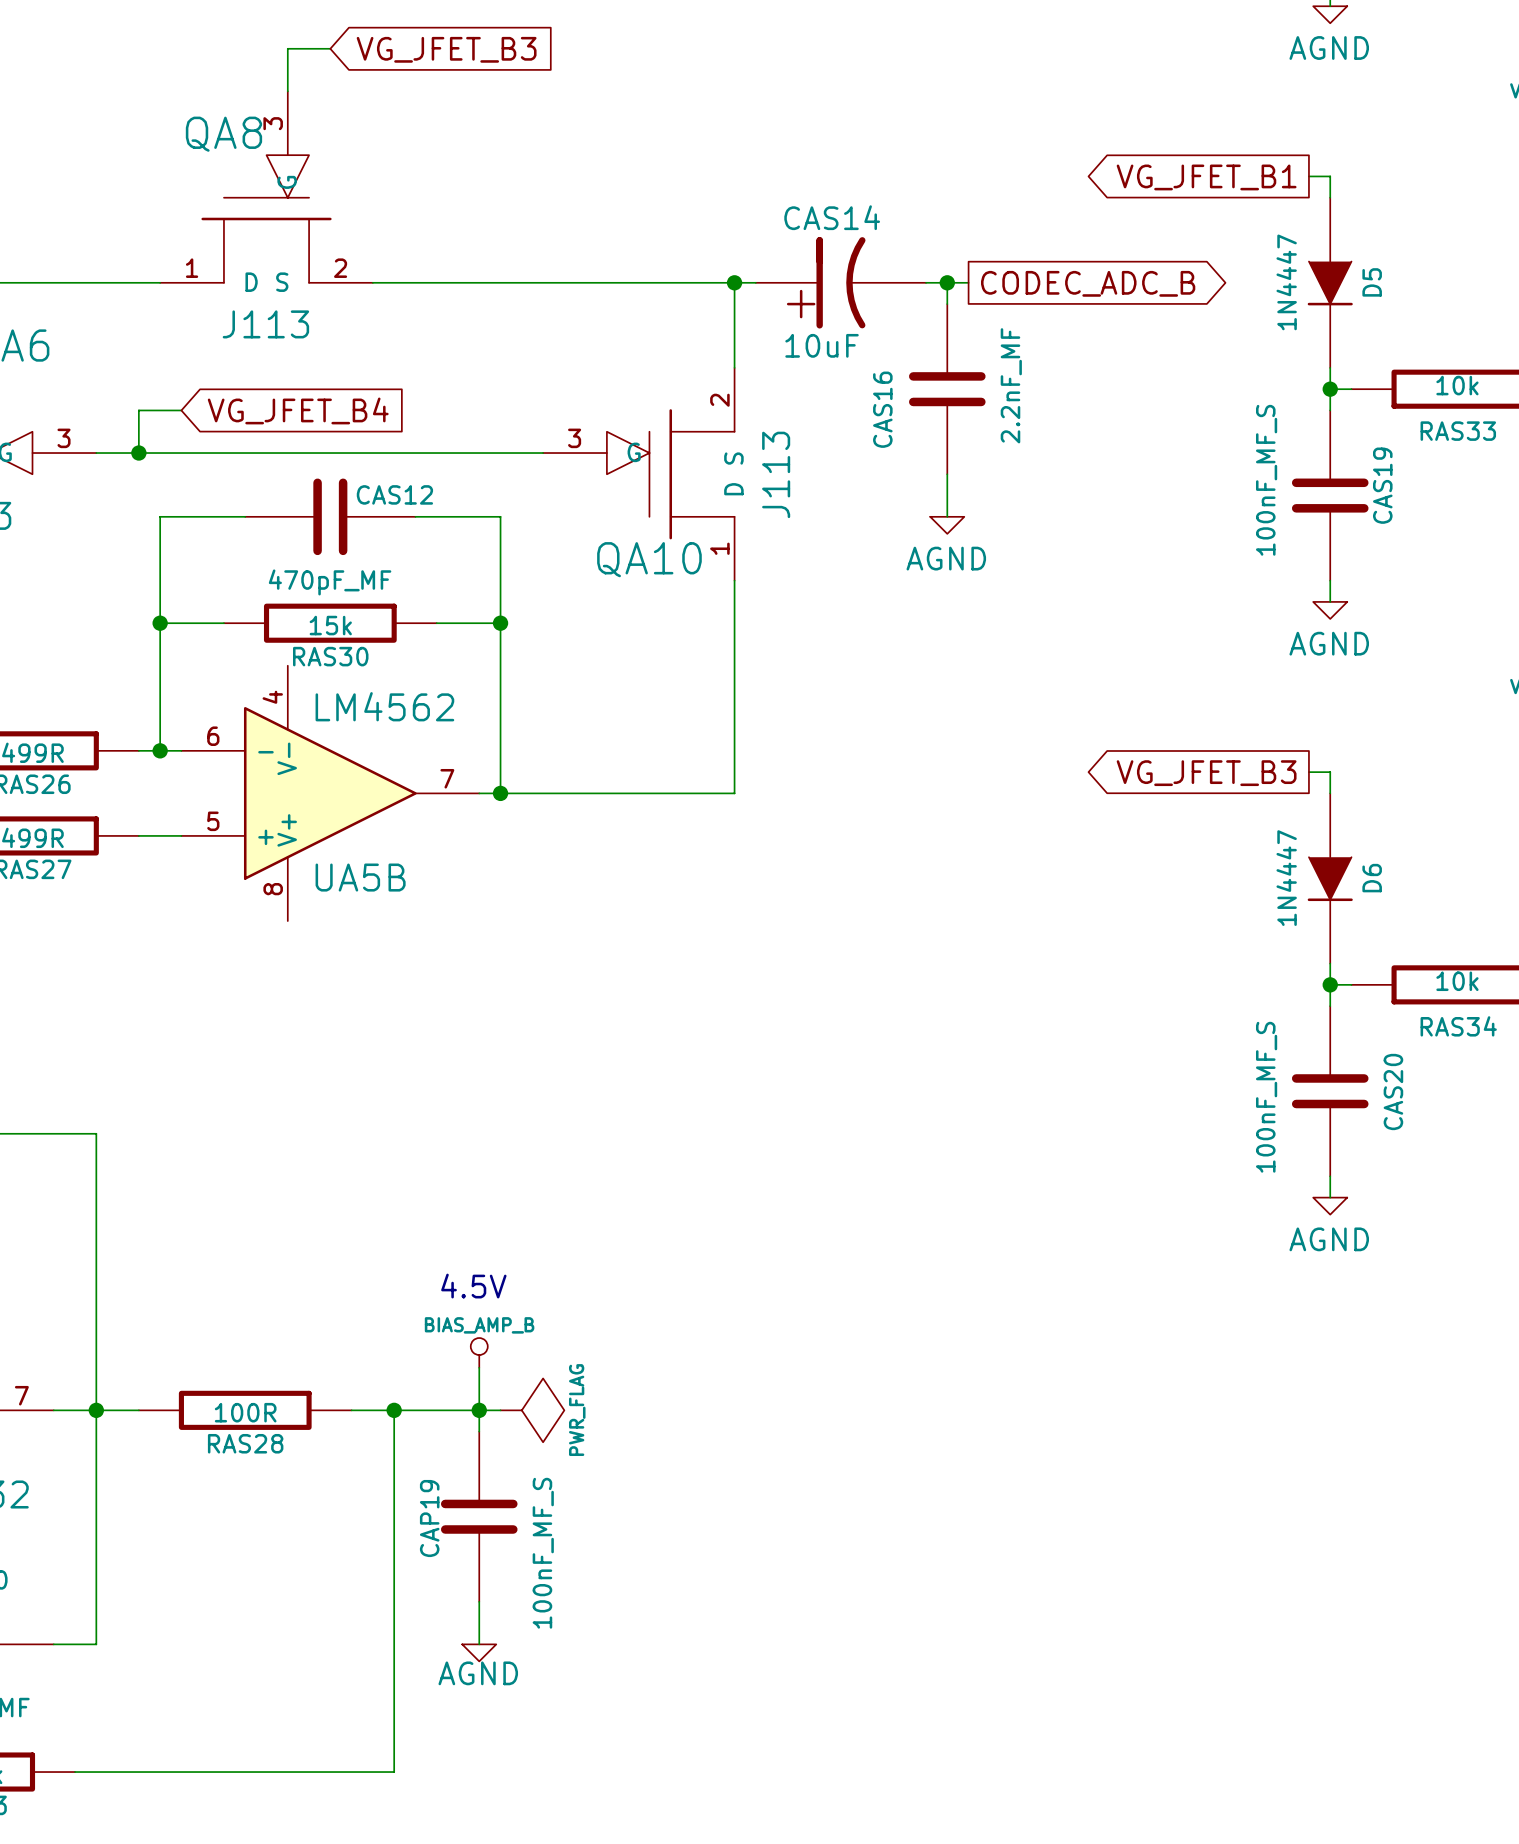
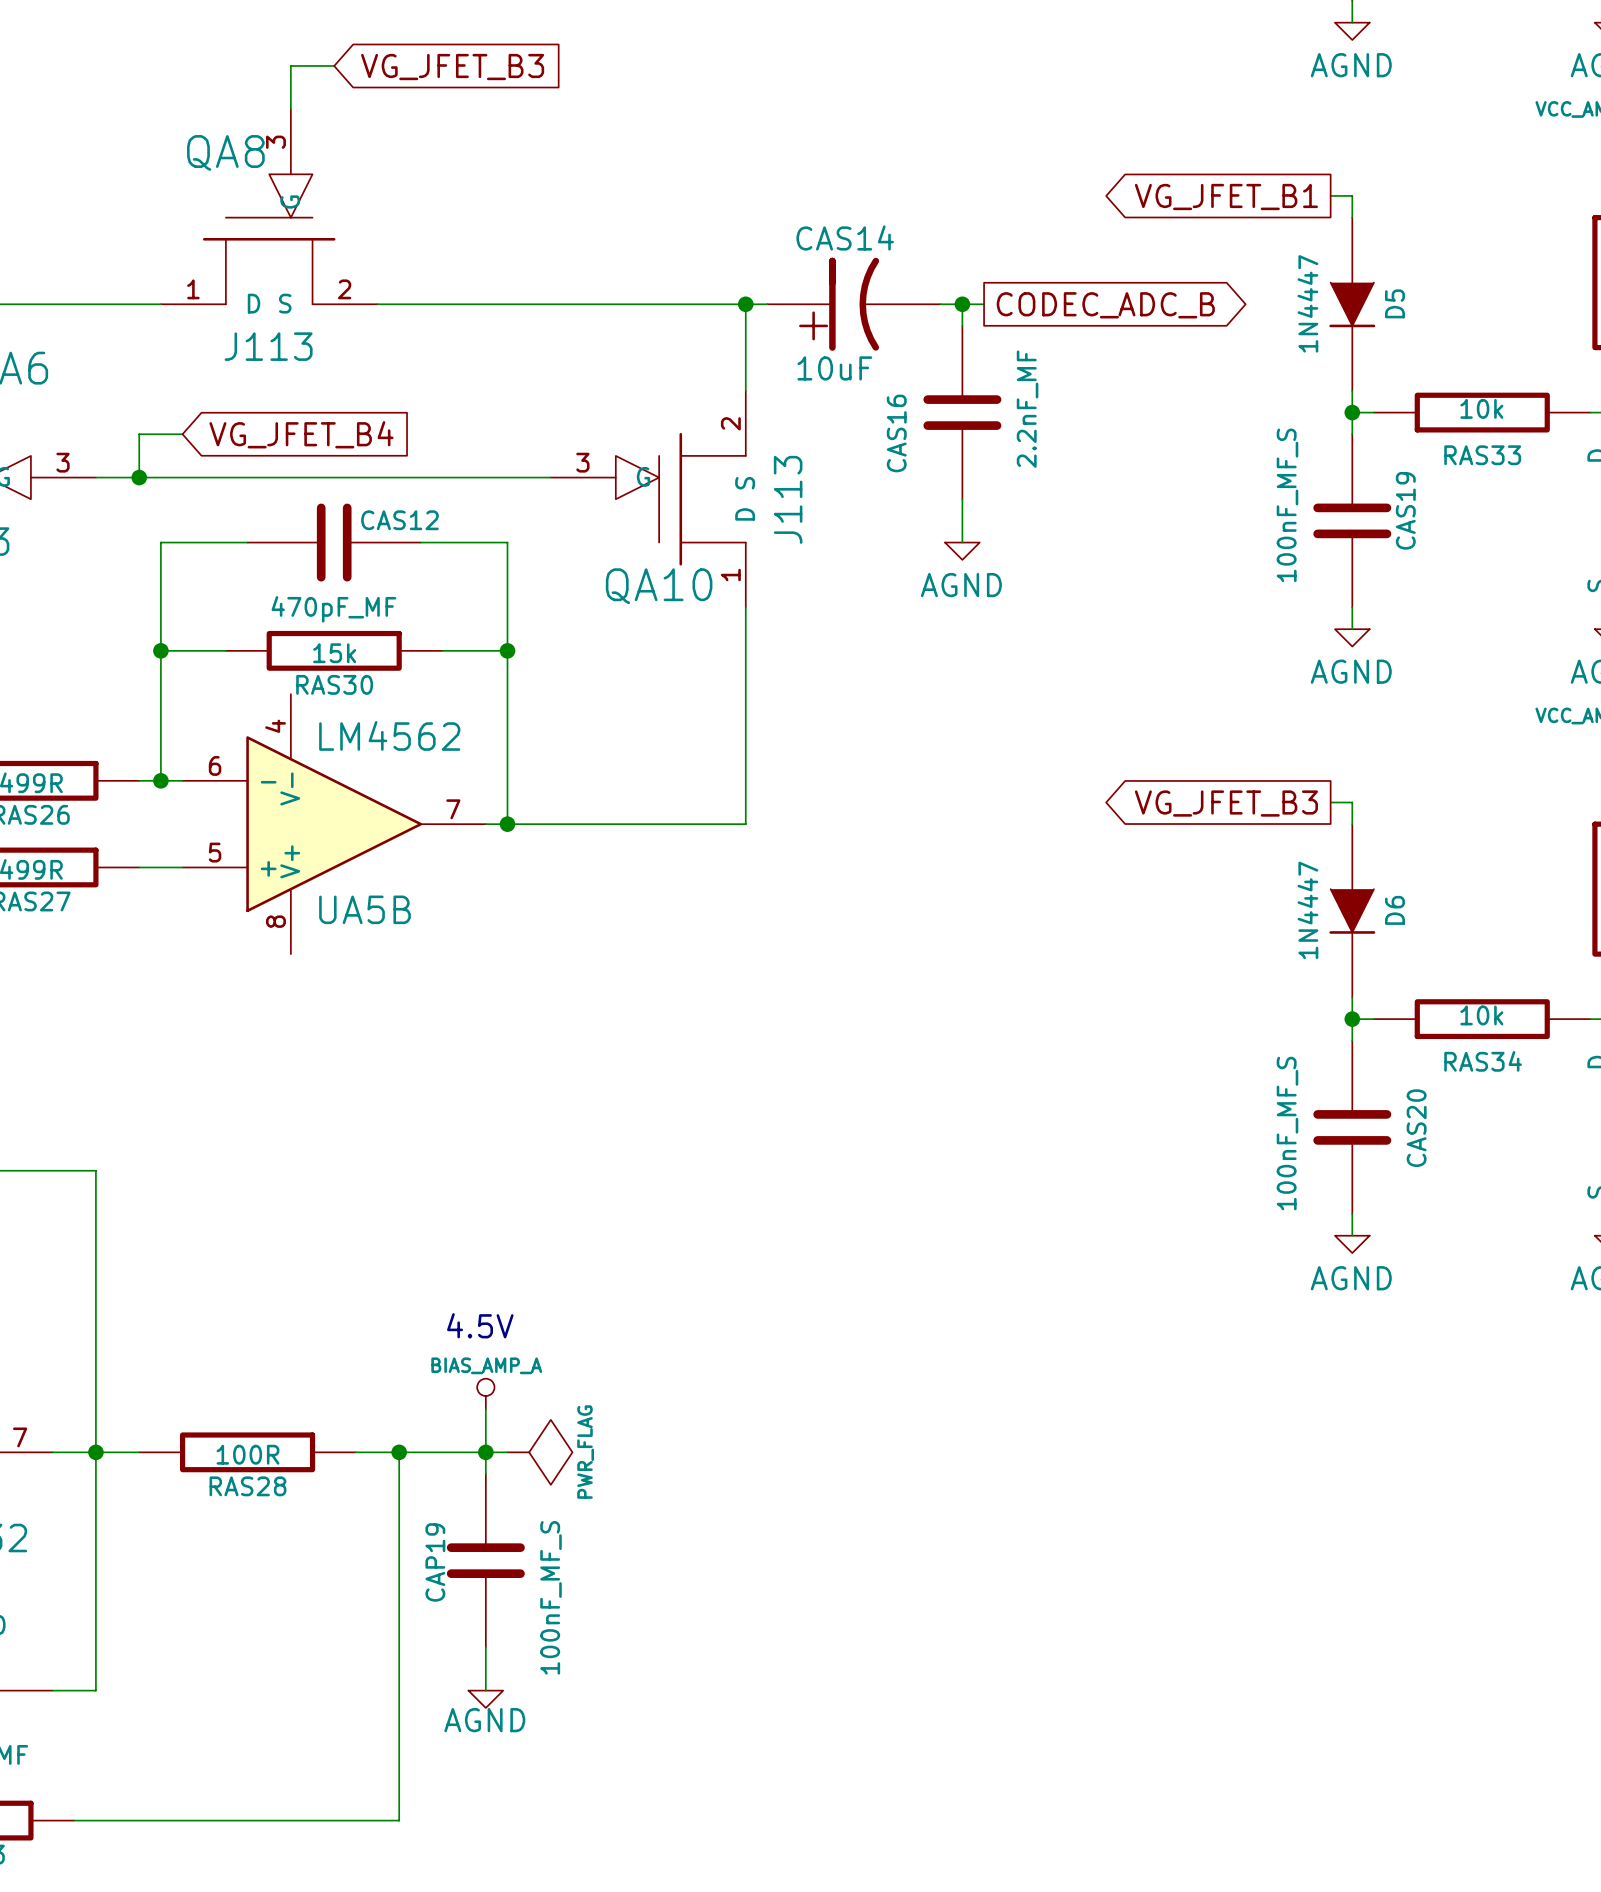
power symbol: BIAS_AMP_B (479, 1352) -> BIAS_AMP_A (485, 1393)

